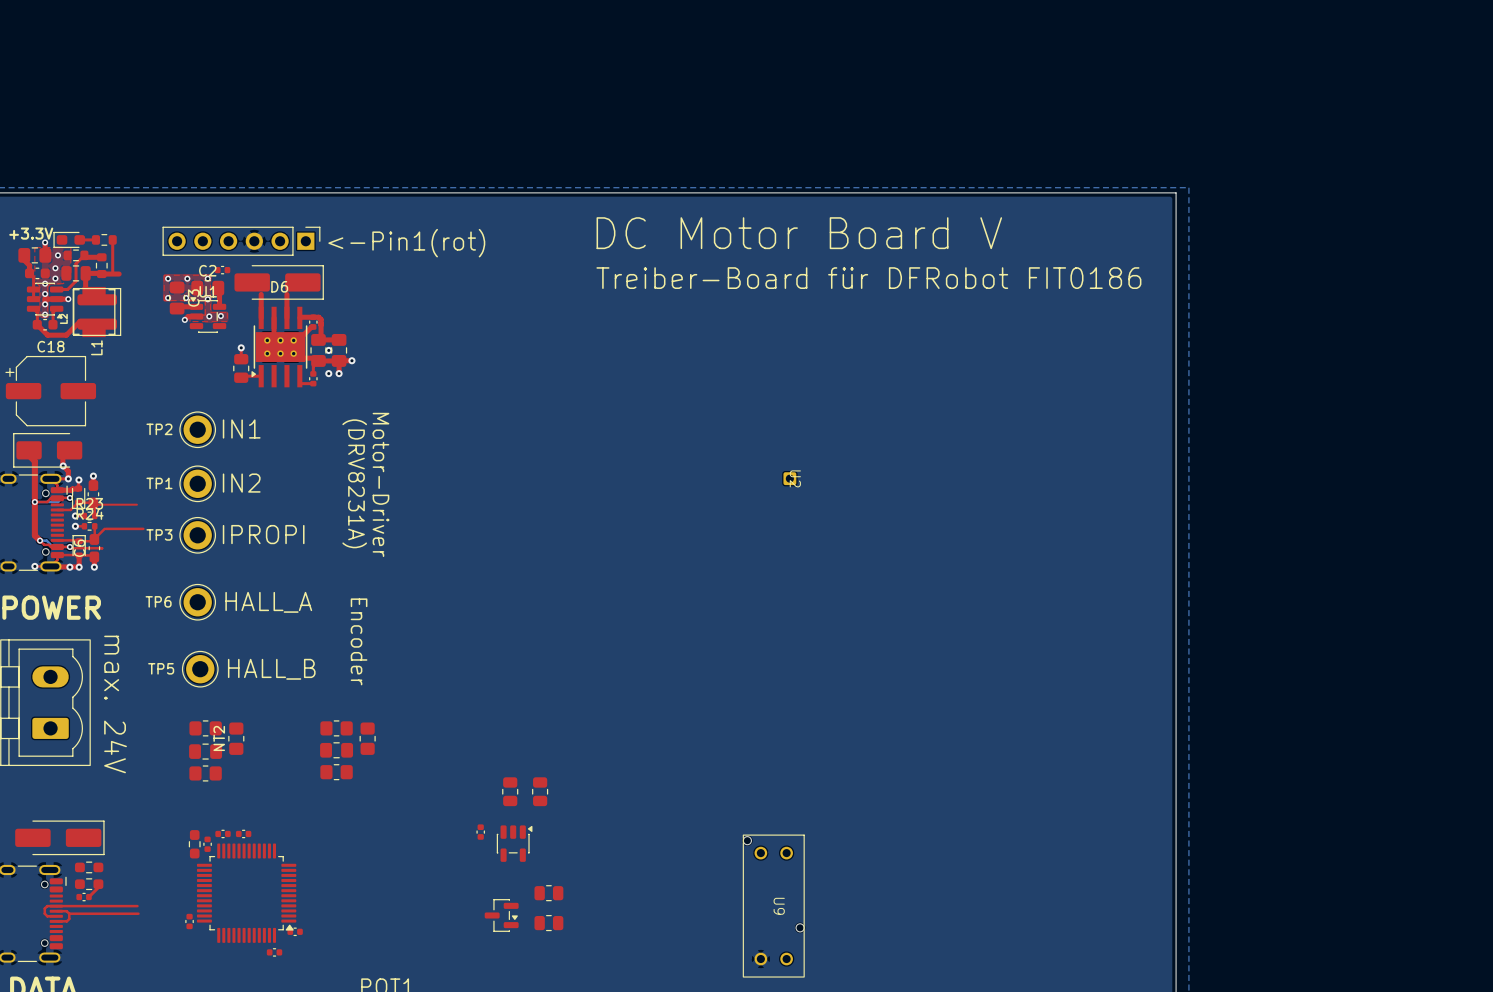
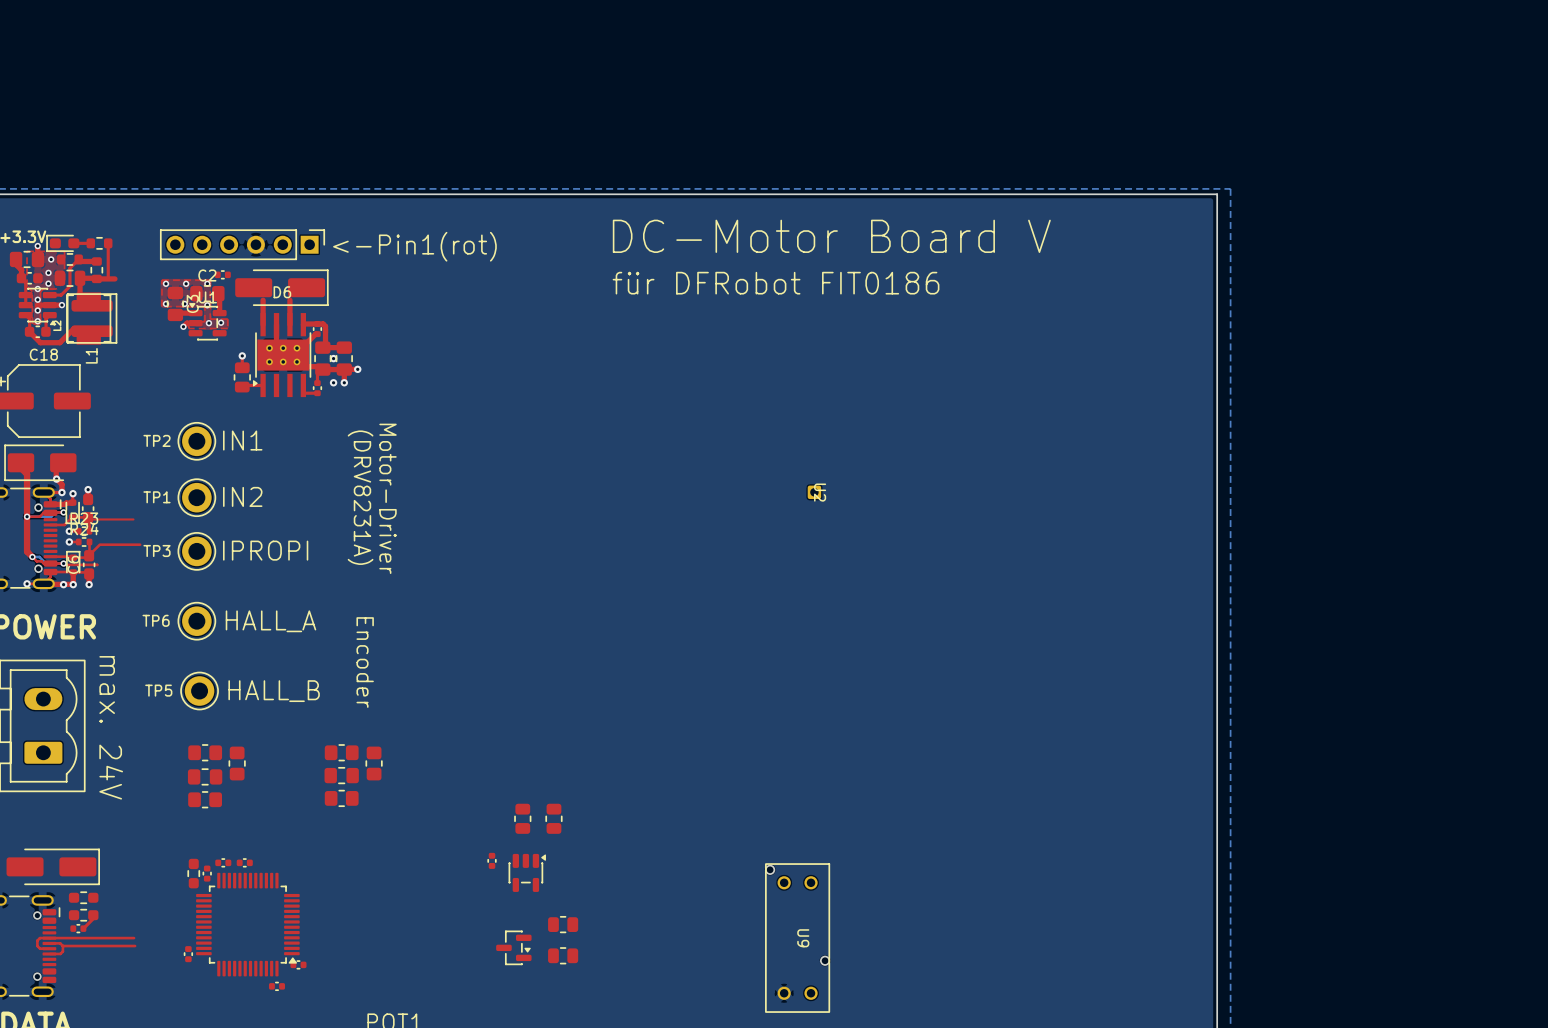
text: DC Motor Board V (799, 233) -> DC-Motor Board V (831, 236)
text: Treiber-Board für DFRobot FIT0186 (868, 278) -> für DFRobot FIT0186 (776, 283)
NT2 name: NT2 (219, 738) -> none

